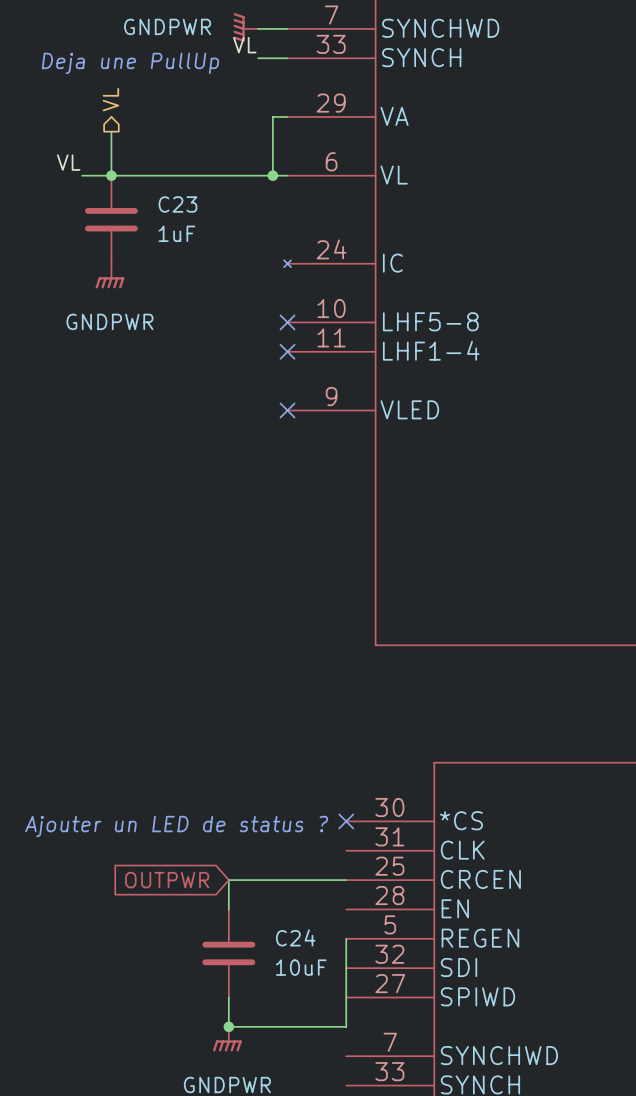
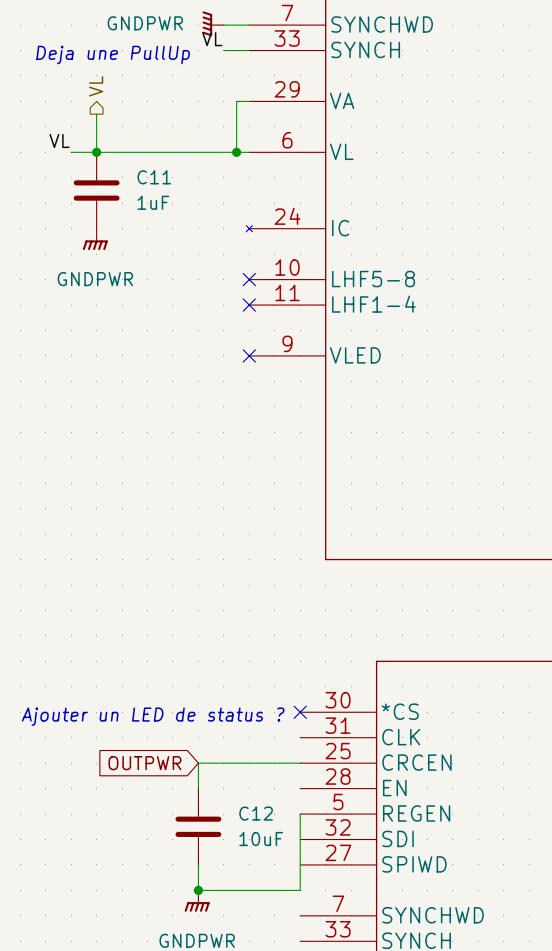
C23 name: C23 (177, 204) -> C11 (154, 177)
C24 name: C24 (295, 937) -> C12 (256, 813)

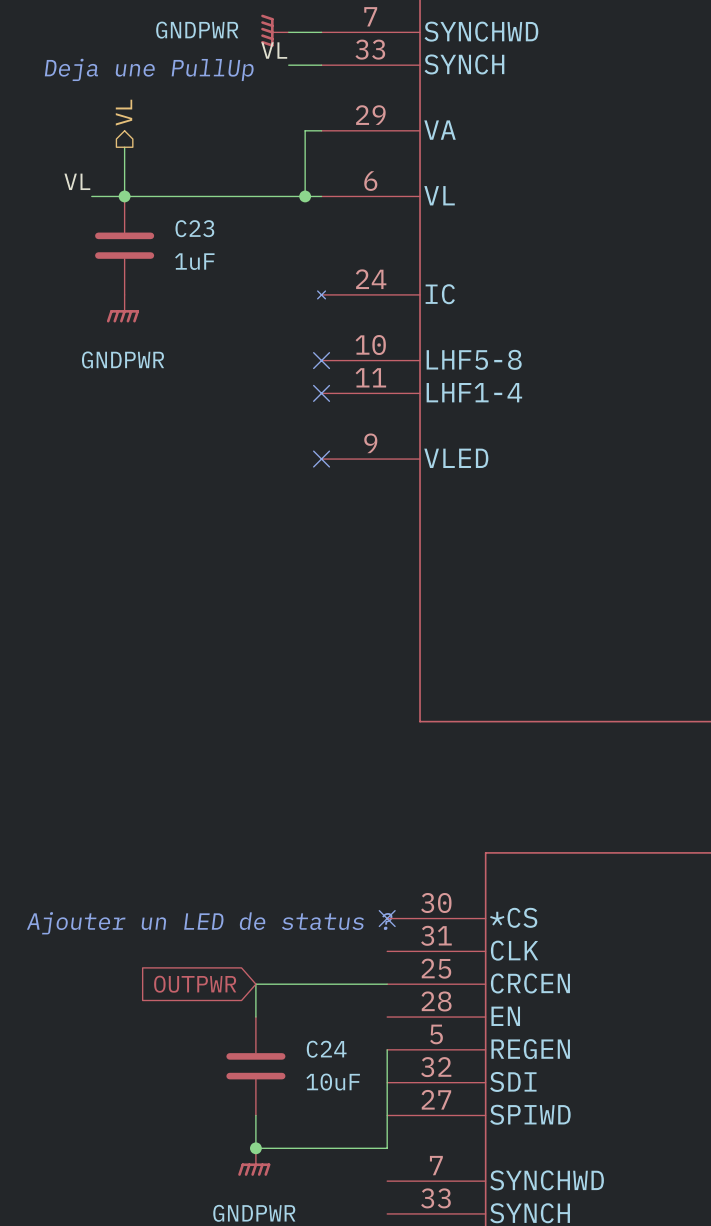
C11 name: C11 (154, 177) -> C23 (194, 228)
C12 name: C12 (256, 813) -> C24 (326, 1049)

